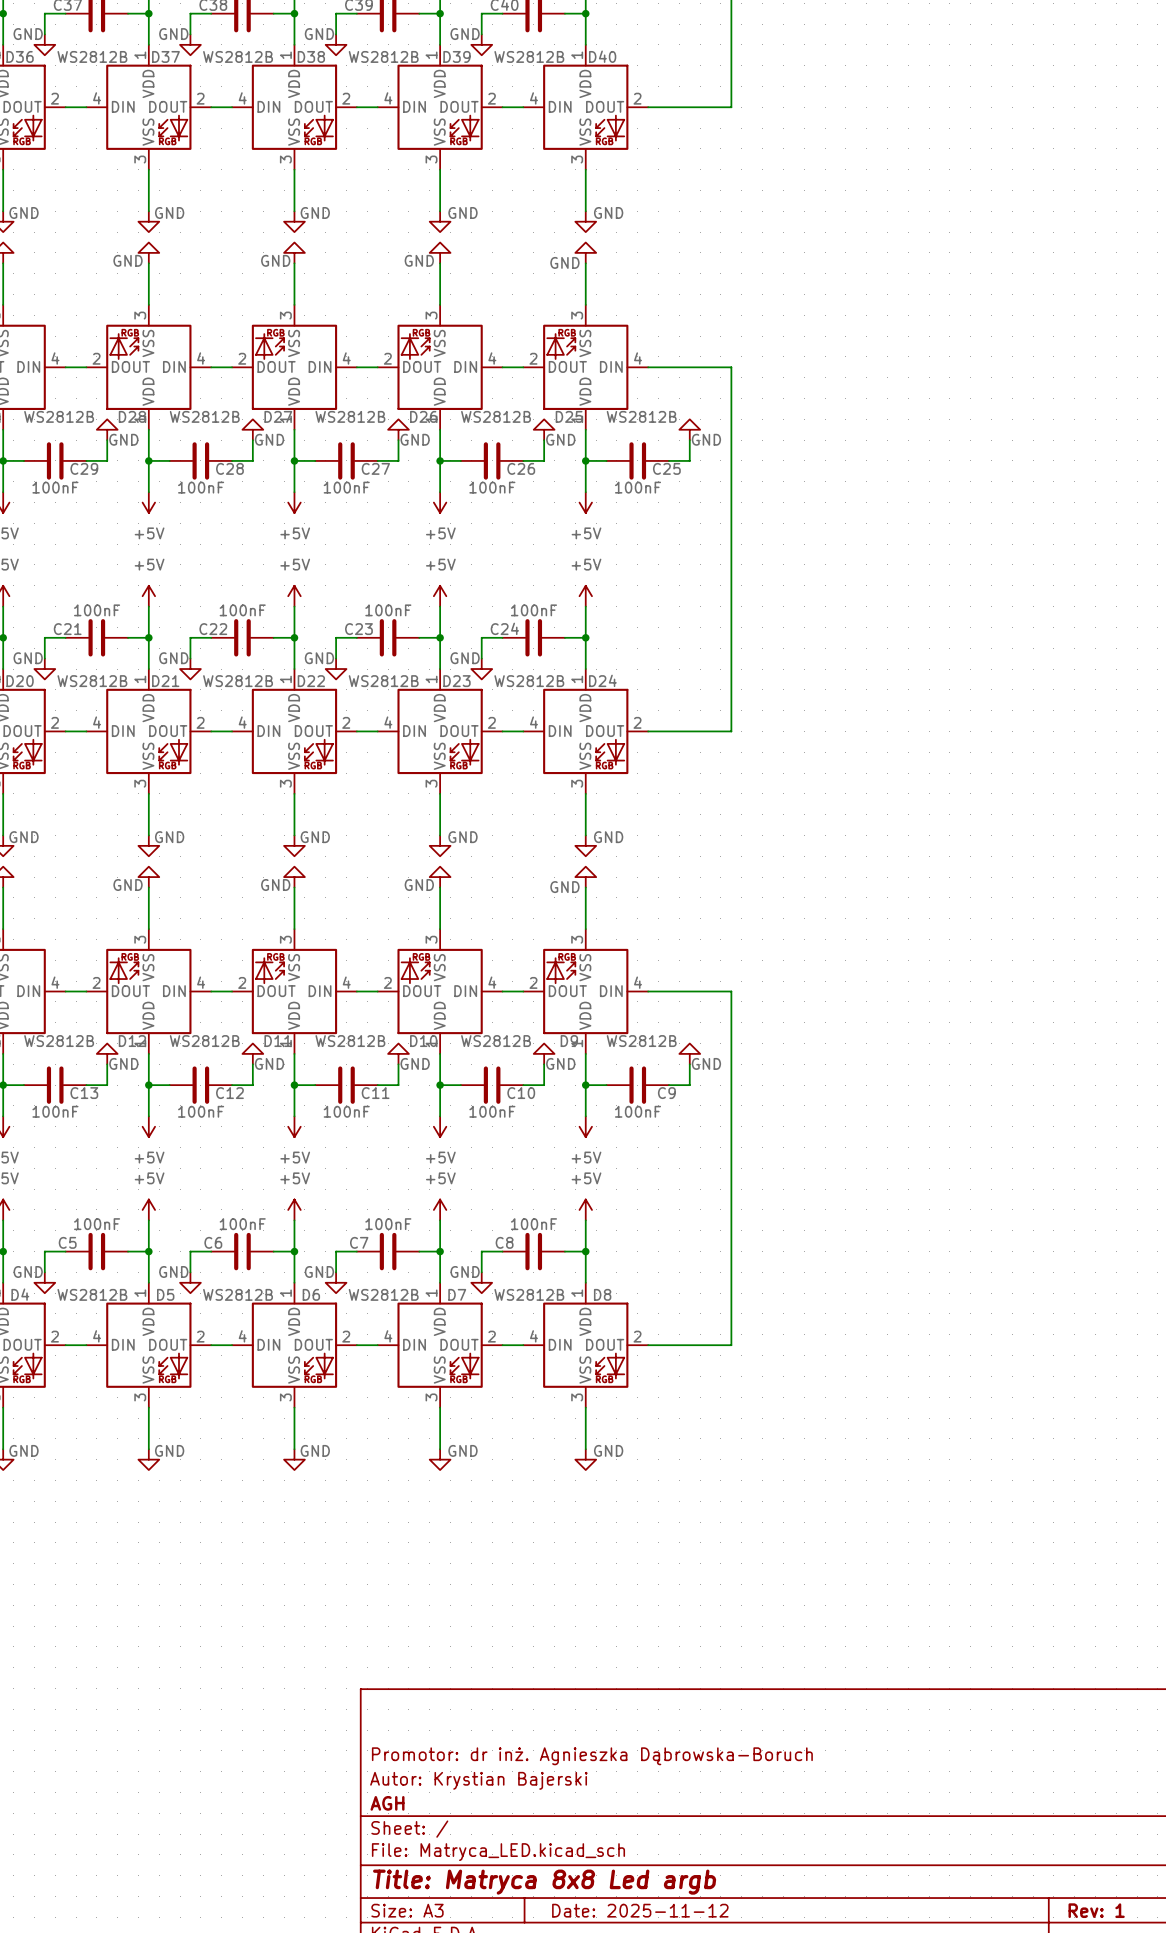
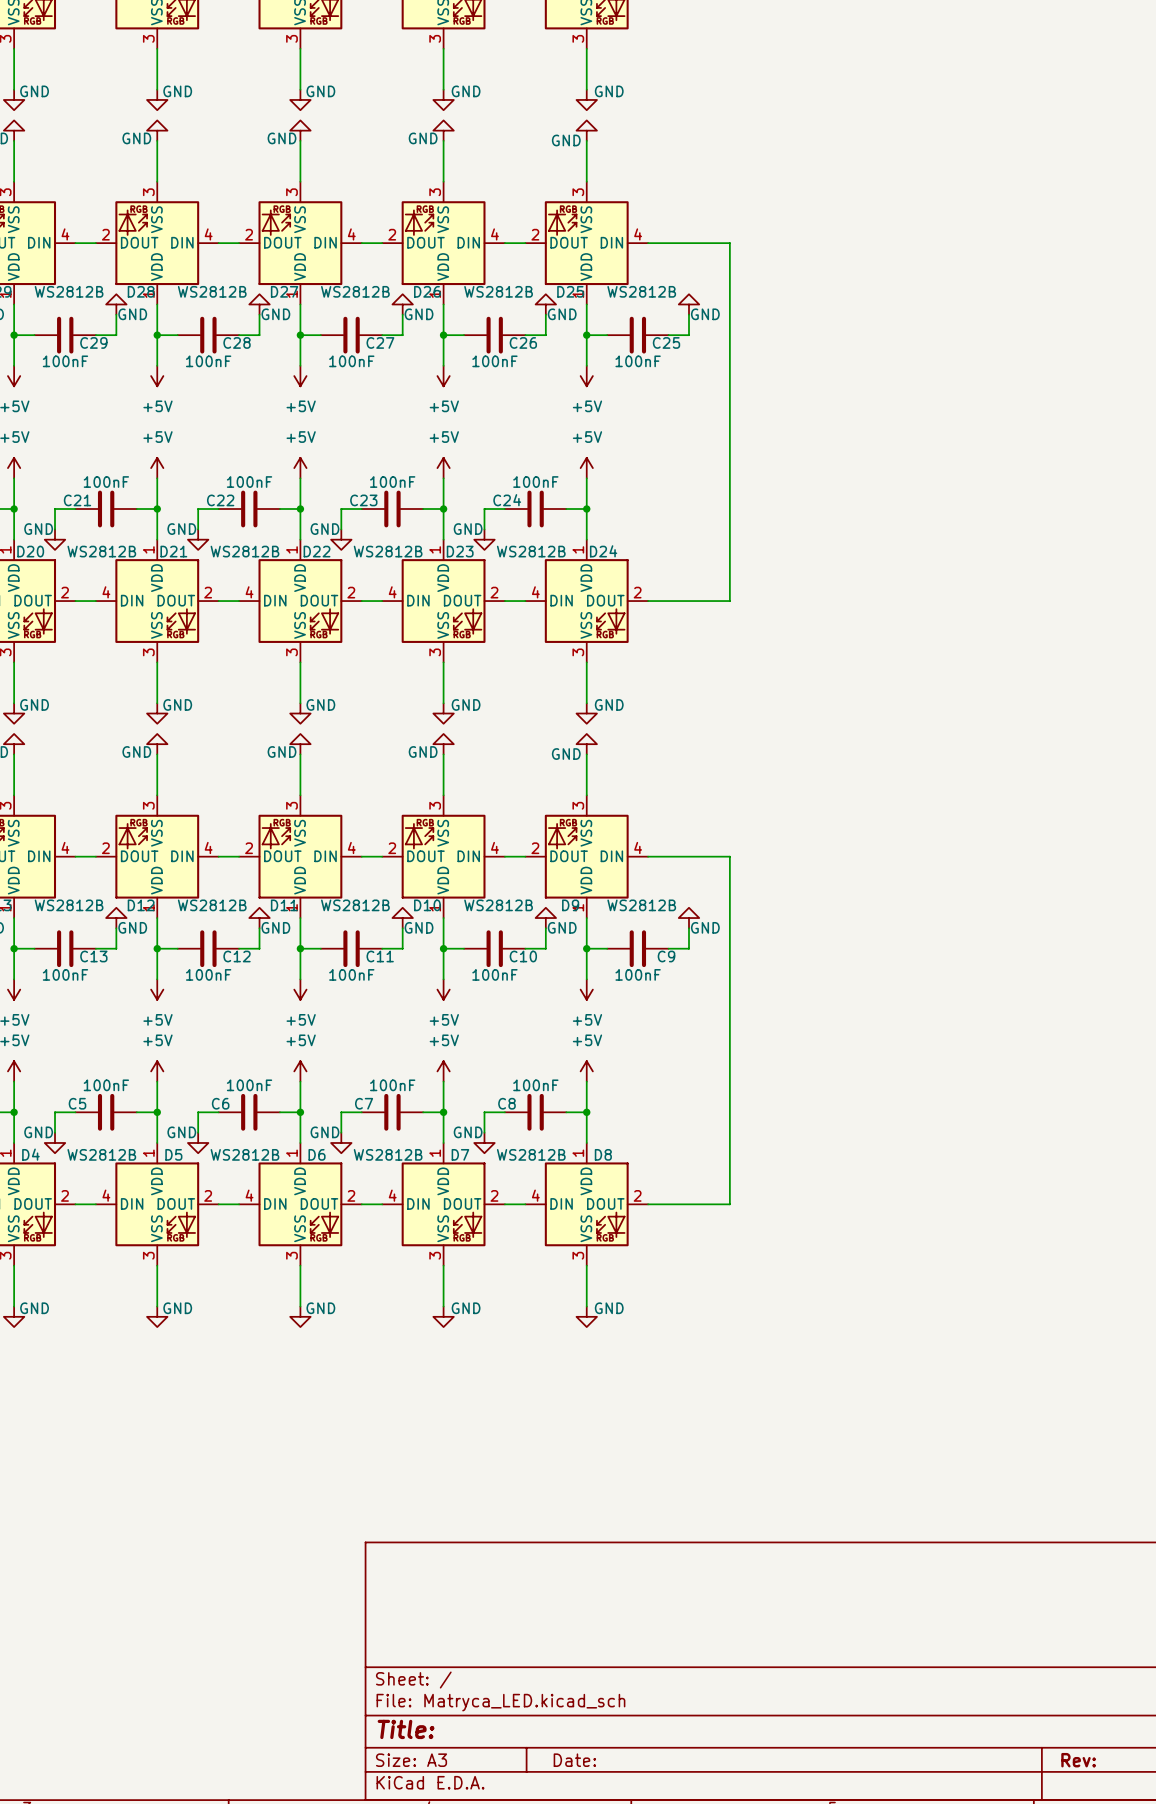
title block: Promotor: dr inż. Agnieszka Dąbrowska-Boruch (592, 1756) -> none
title block: Autor: Krystian Bajerski (478, 1780) -> none
title block: AGH (387, 1803) -> none
title block: Title: Matryca 8x8 Led argb (544, 1882) -> Title: (406, 1729)
title block: Date: 2025-11-12 (640, 1910) -> Date: (574, 1760)
title block: Rev: 1 (1096, 1910) -> Rev: (1078, 1760)

